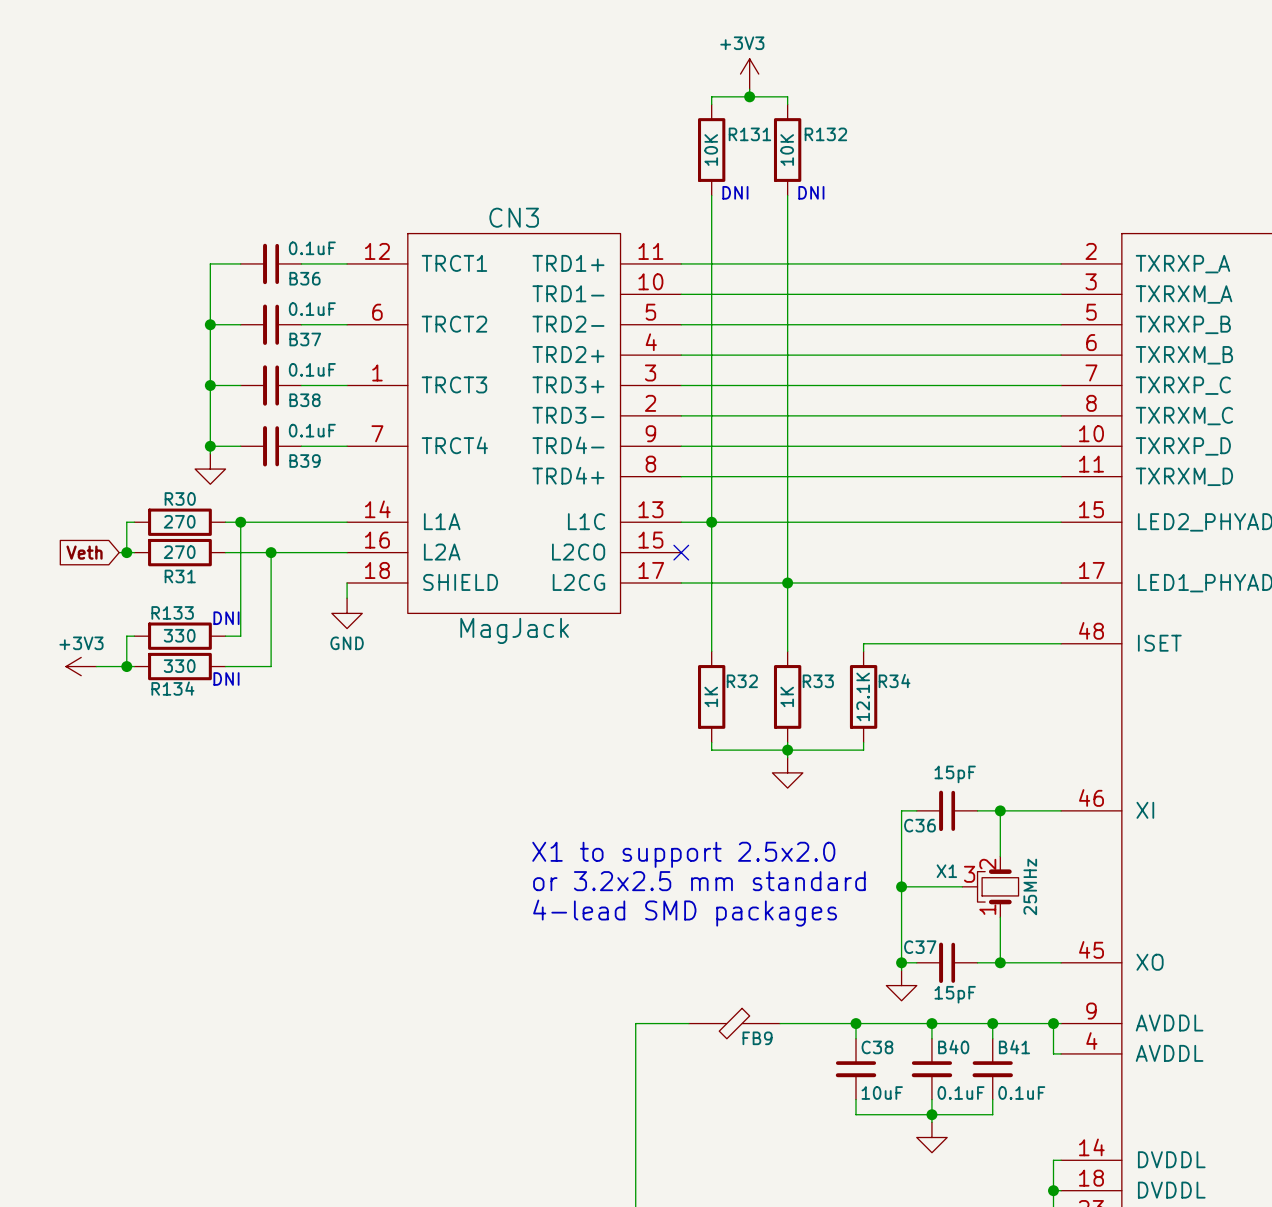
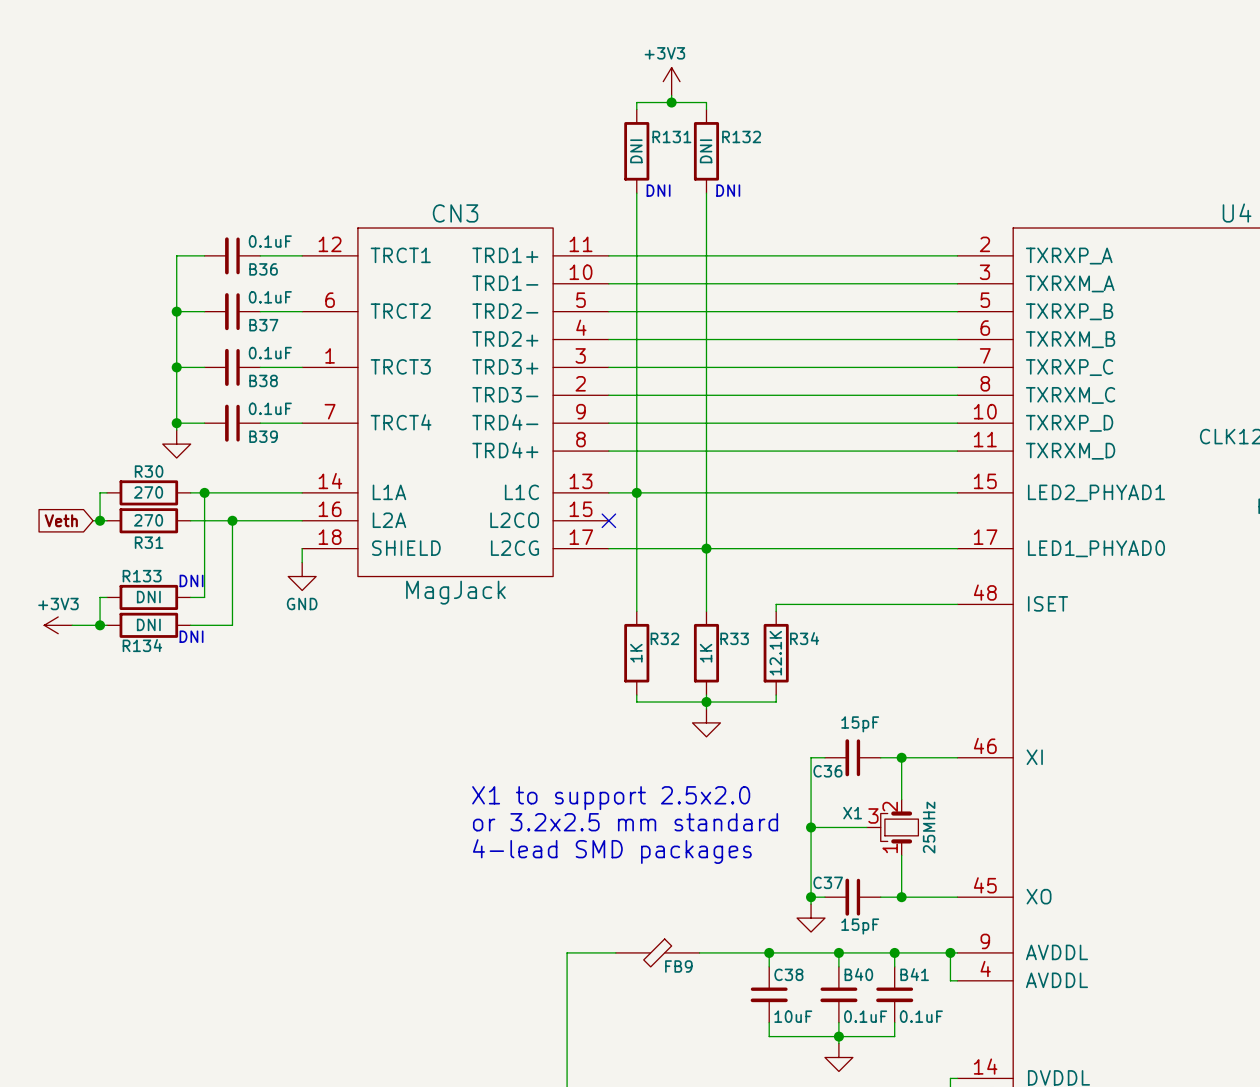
R131 value: 10K (711, 150) -> DNI (636, 151)
R132 value: 10K (787, 150) -> DNI (706, 151)
R133 value: 330 (179, 635) -> DNI (148, 597)
R134 value: 330 (179, 666) -> DNI (148, 624)

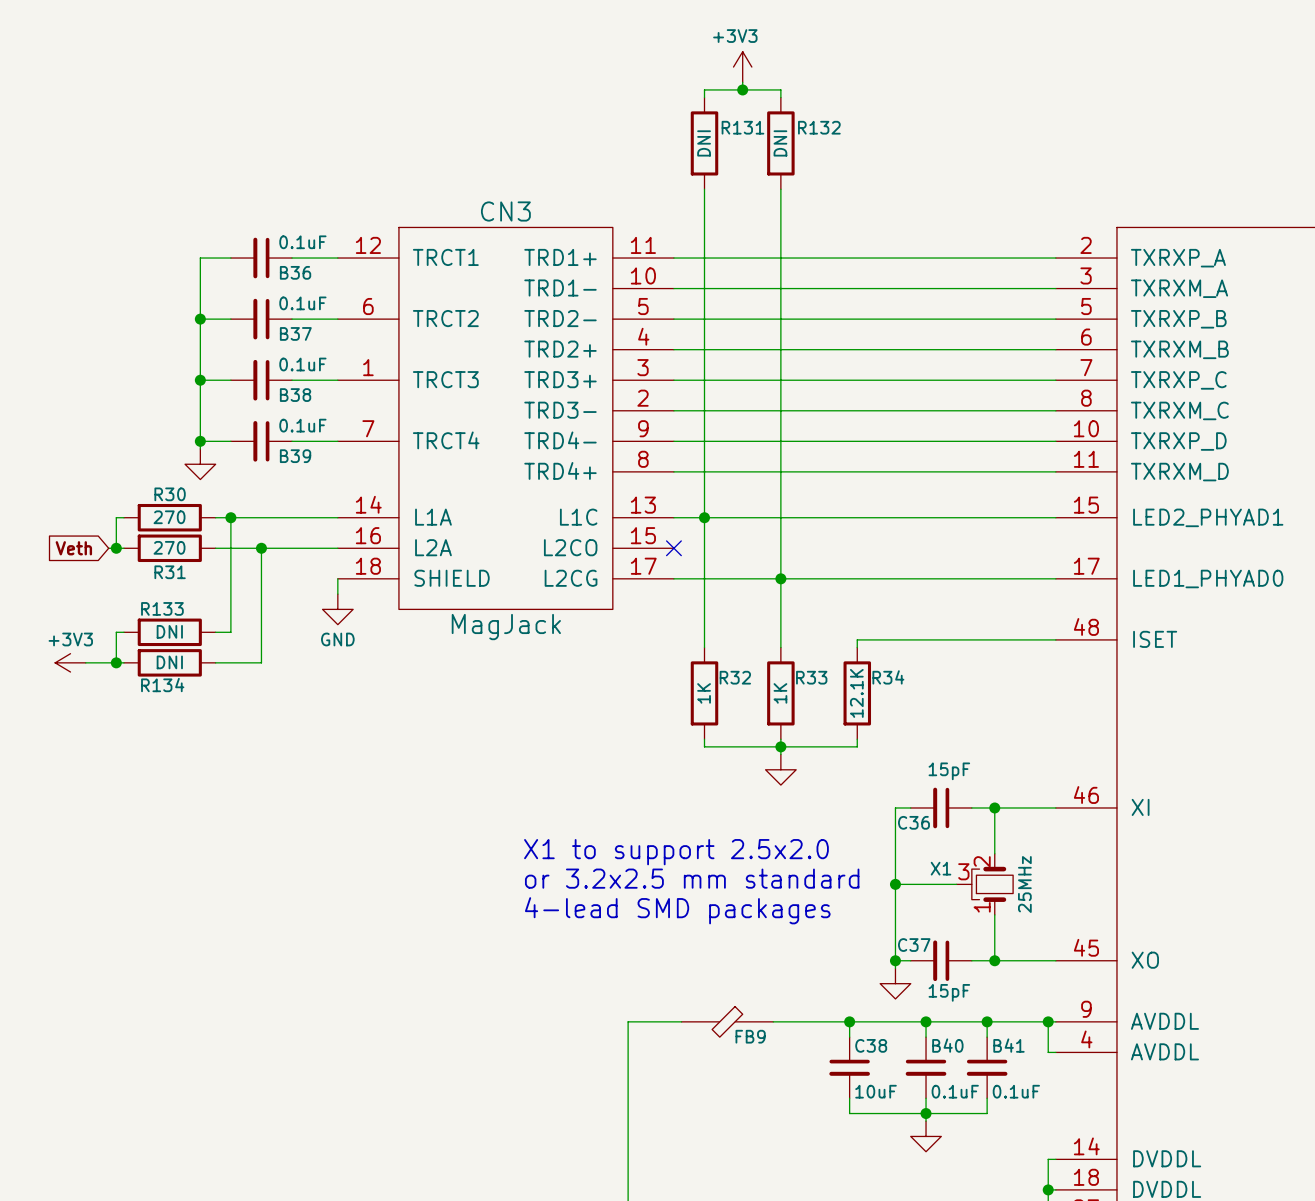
text: DNI (658, 190) -> none
text: DNI (728, 190) -> none
text: DNI (191, 580) -> none
text: DNI (191, 636) -> none

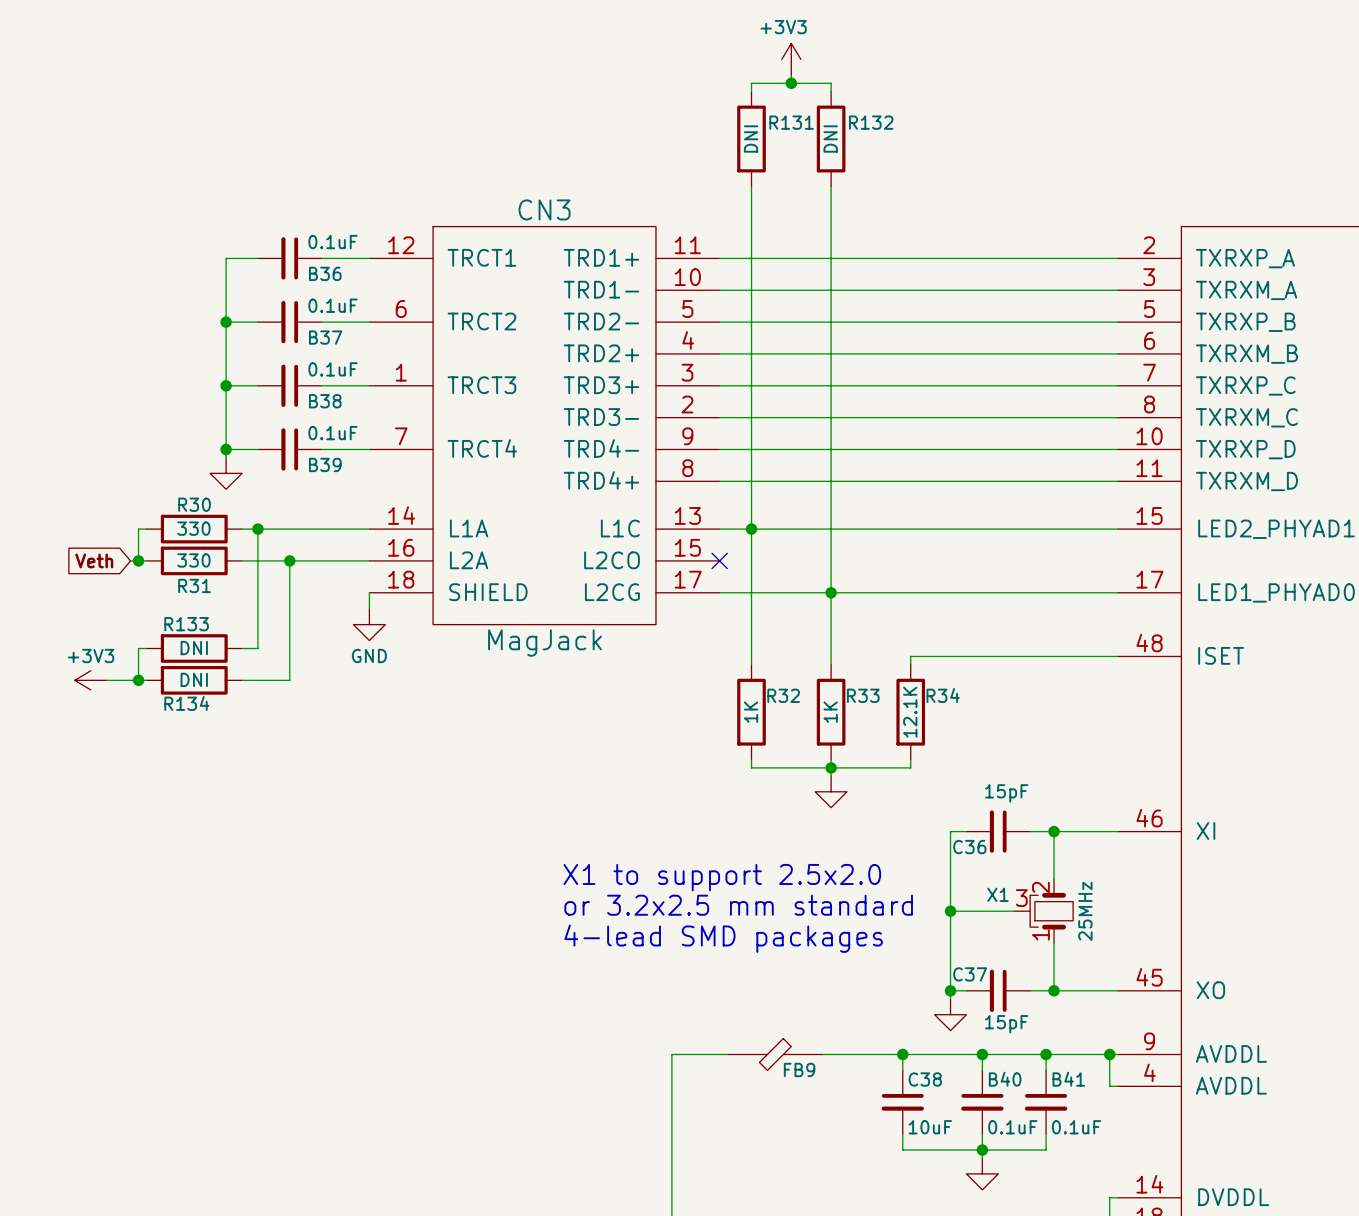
R30 value: 270 (169, 517) -> 330 (193, 528)
R31 value: 270 (169, 547) -> 330 (193, 560)

